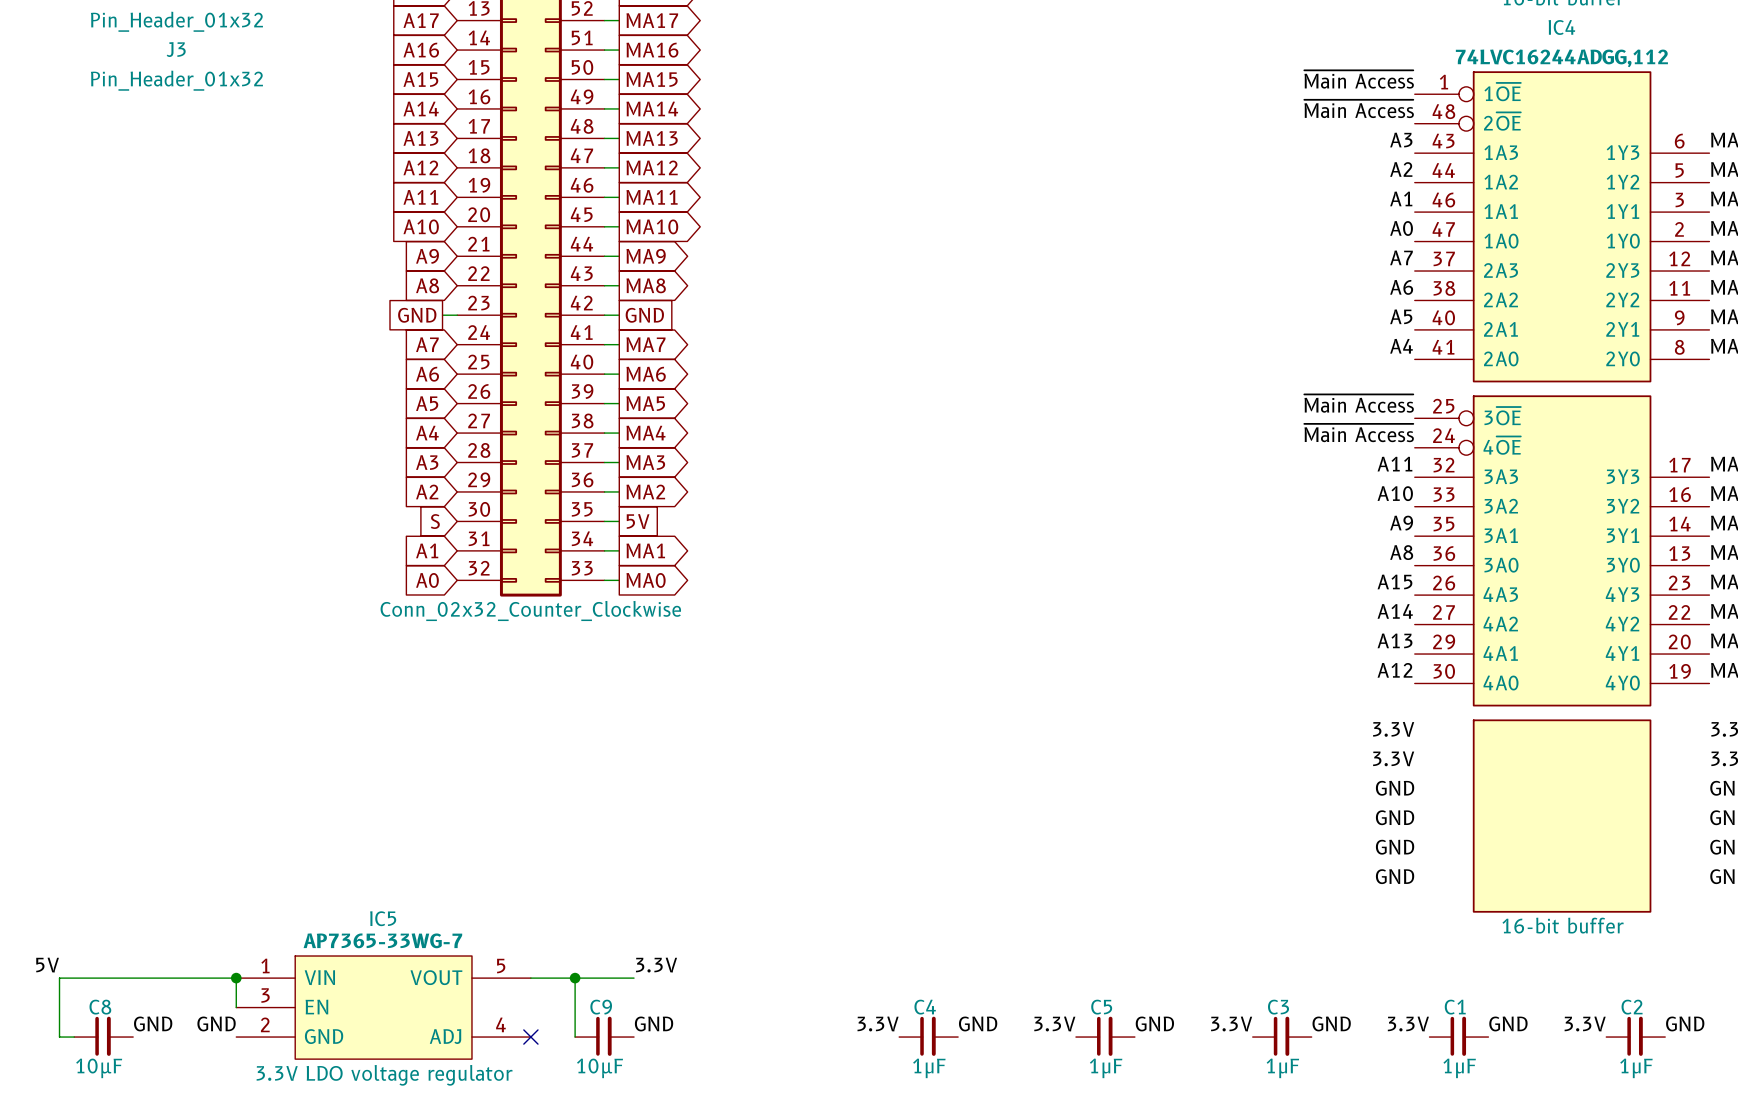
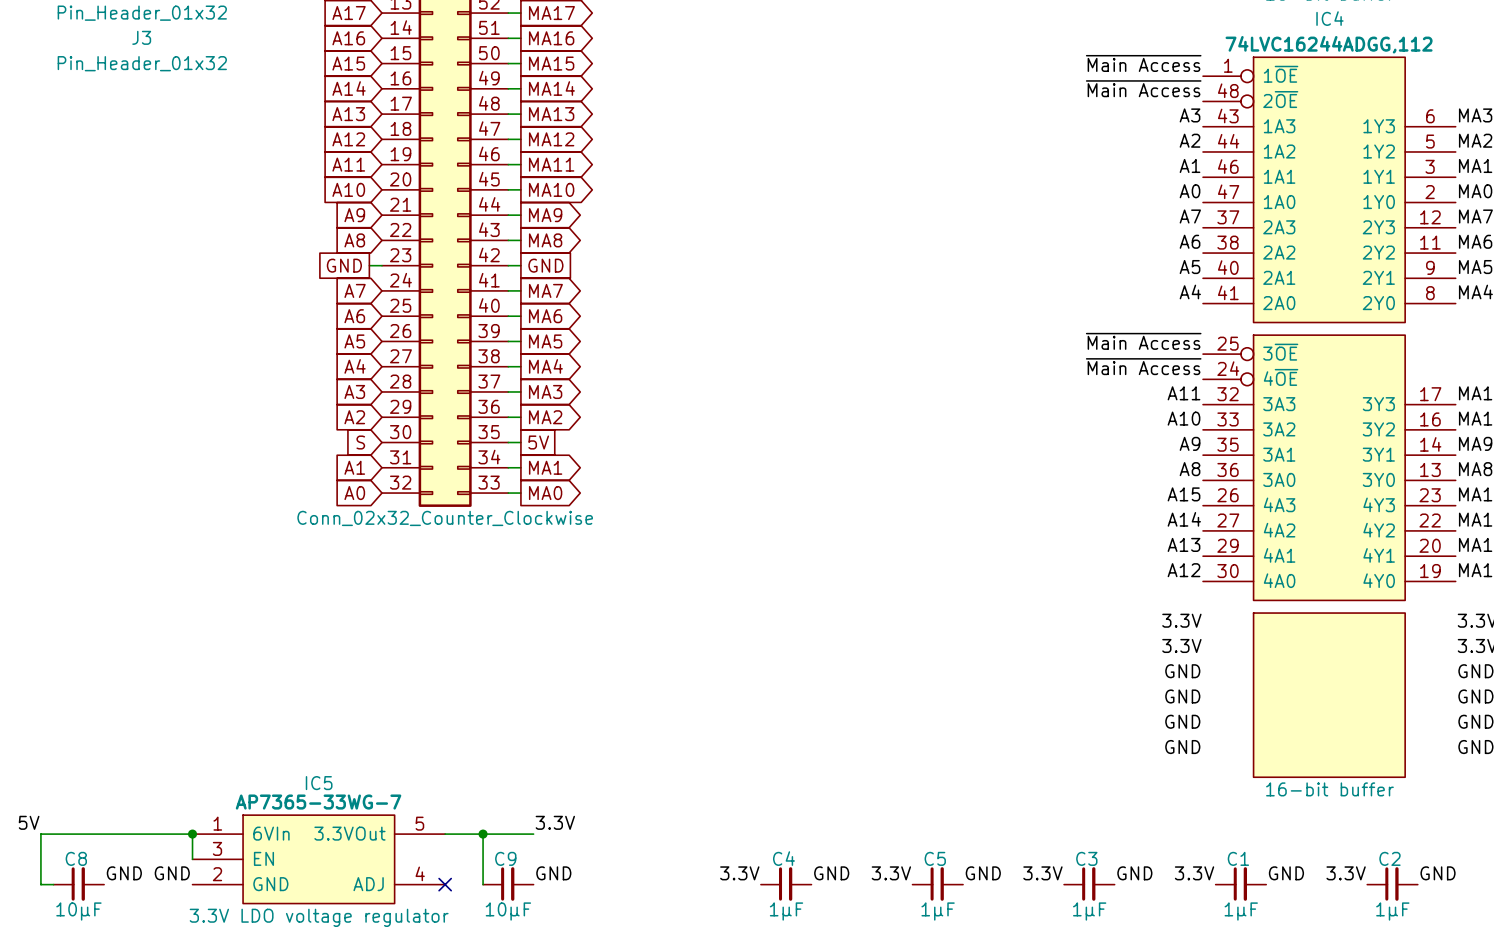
IC5 pin name: VIN (319, 977) -> 6VIn (271, 833)
IC5 pin name: VOUT (436, 977) -> 3.3VOut (349, 833)

